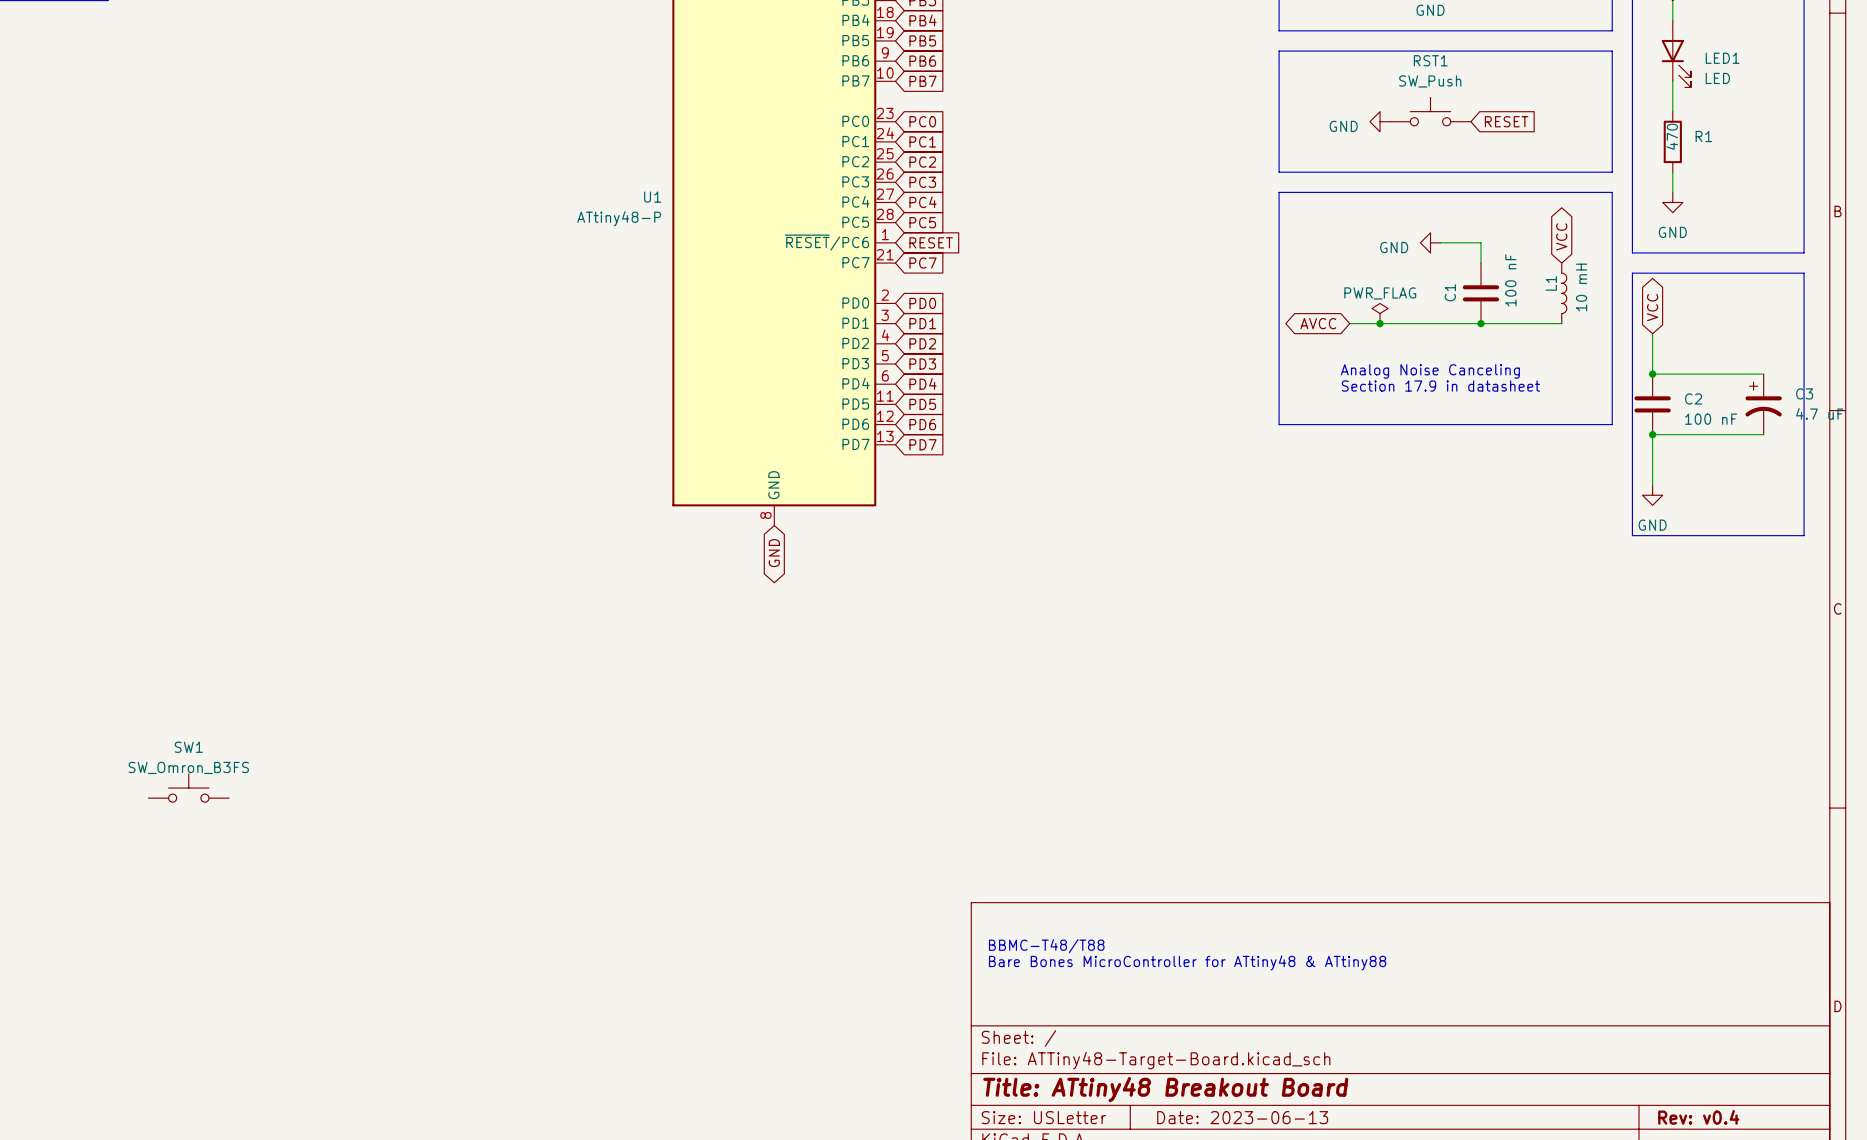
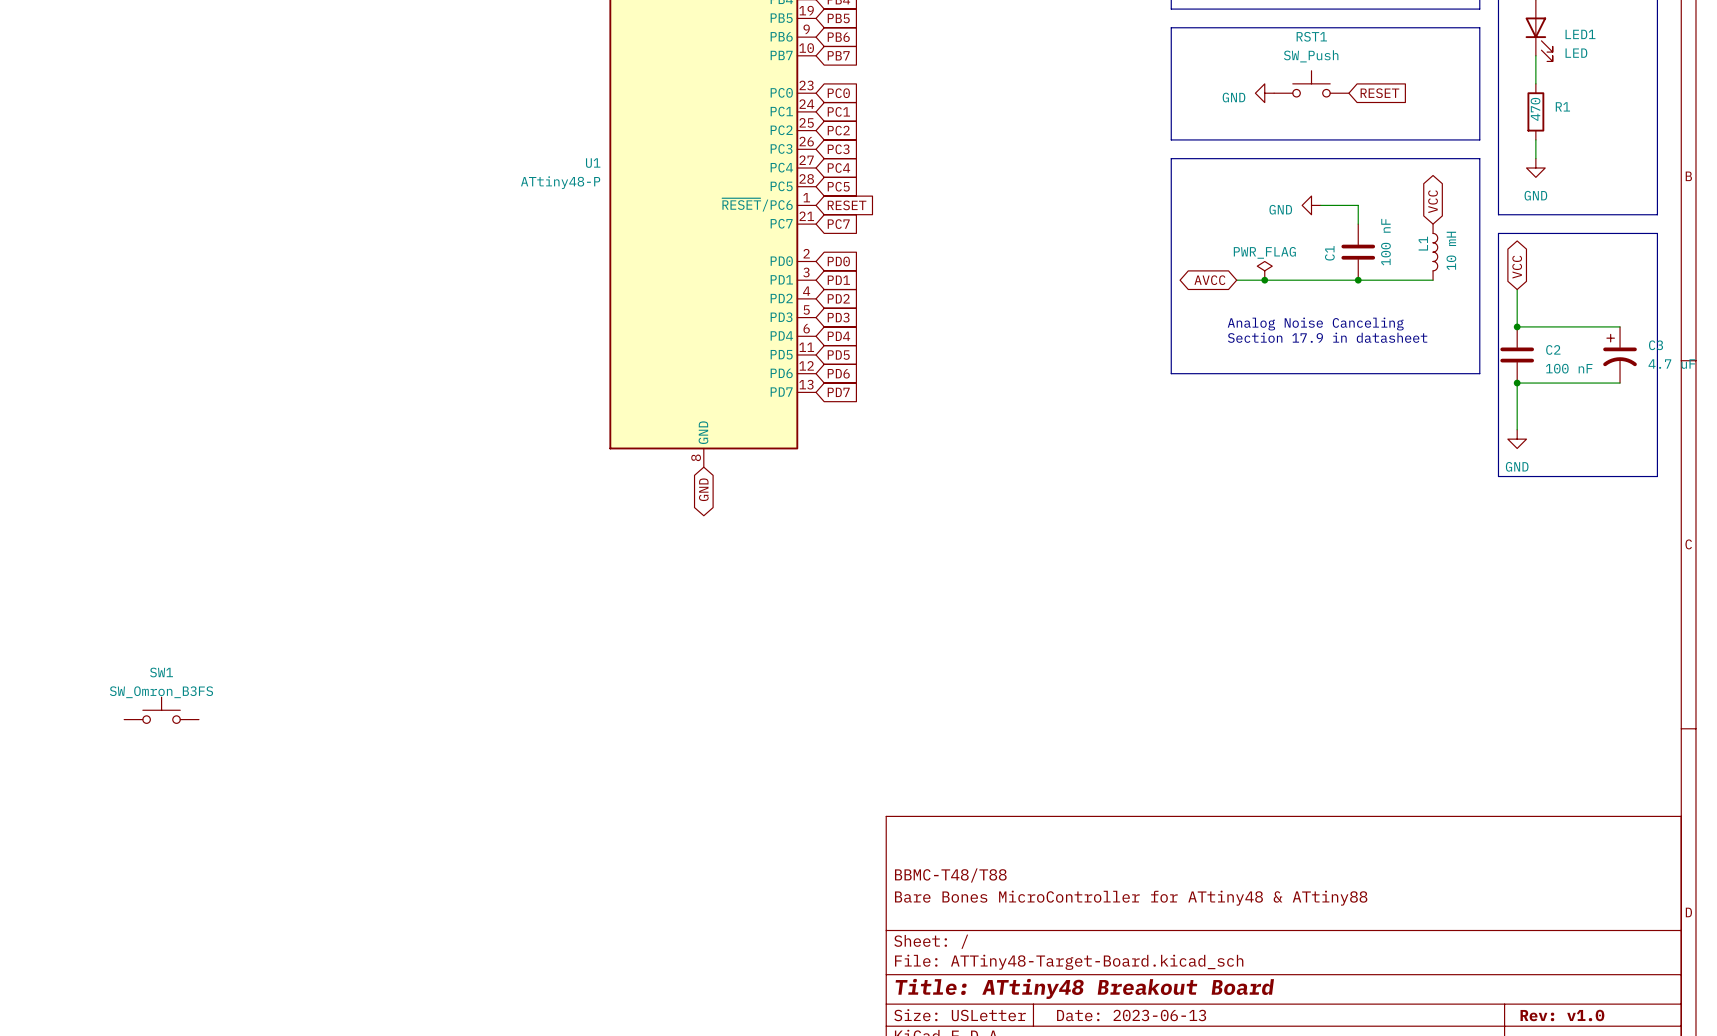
text: BBMC-T48/T88 (1046, 946) -> none
text: Bare Bones MicroController for ATtiny48 & ATtiny88 (1187, 962) -> none
title block: none -> BBMC-T48/T88 (950, 875)
title block: none -> Bare Bones MicroController for ATtiny48 & ATtiny88 (1131, 898)
title block: Rev: v0.4 (1698, 1117) -> Rev: v1.0 (1562, 1015)

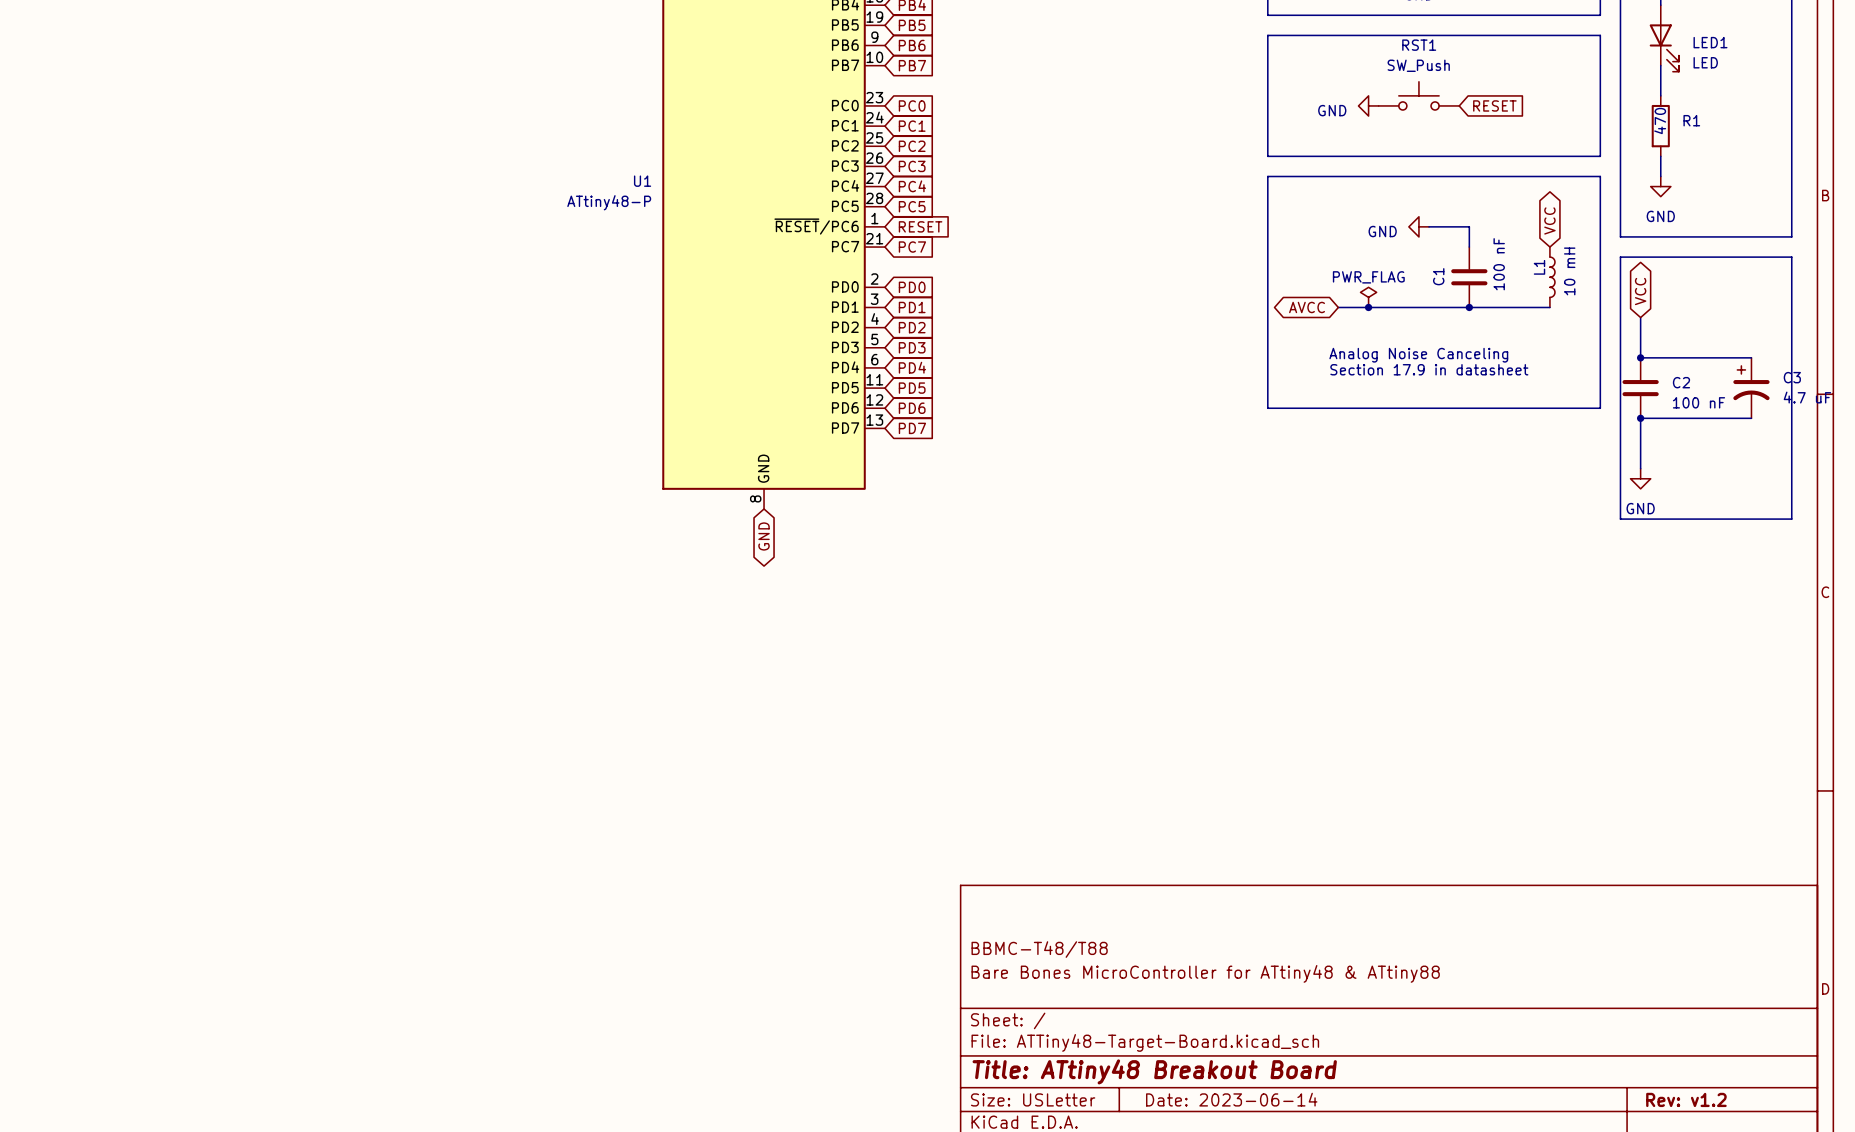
SW1: SW_Omron_B3FS (161, 710) -> none
title block: Date: 2023-06-13 (1131, 1015) -> Date: 2023-06-14 (1231, 1099)
title block: Rev: v1.0 (1562, 1015) -> Rev: v1.2 (1686, 1099)

